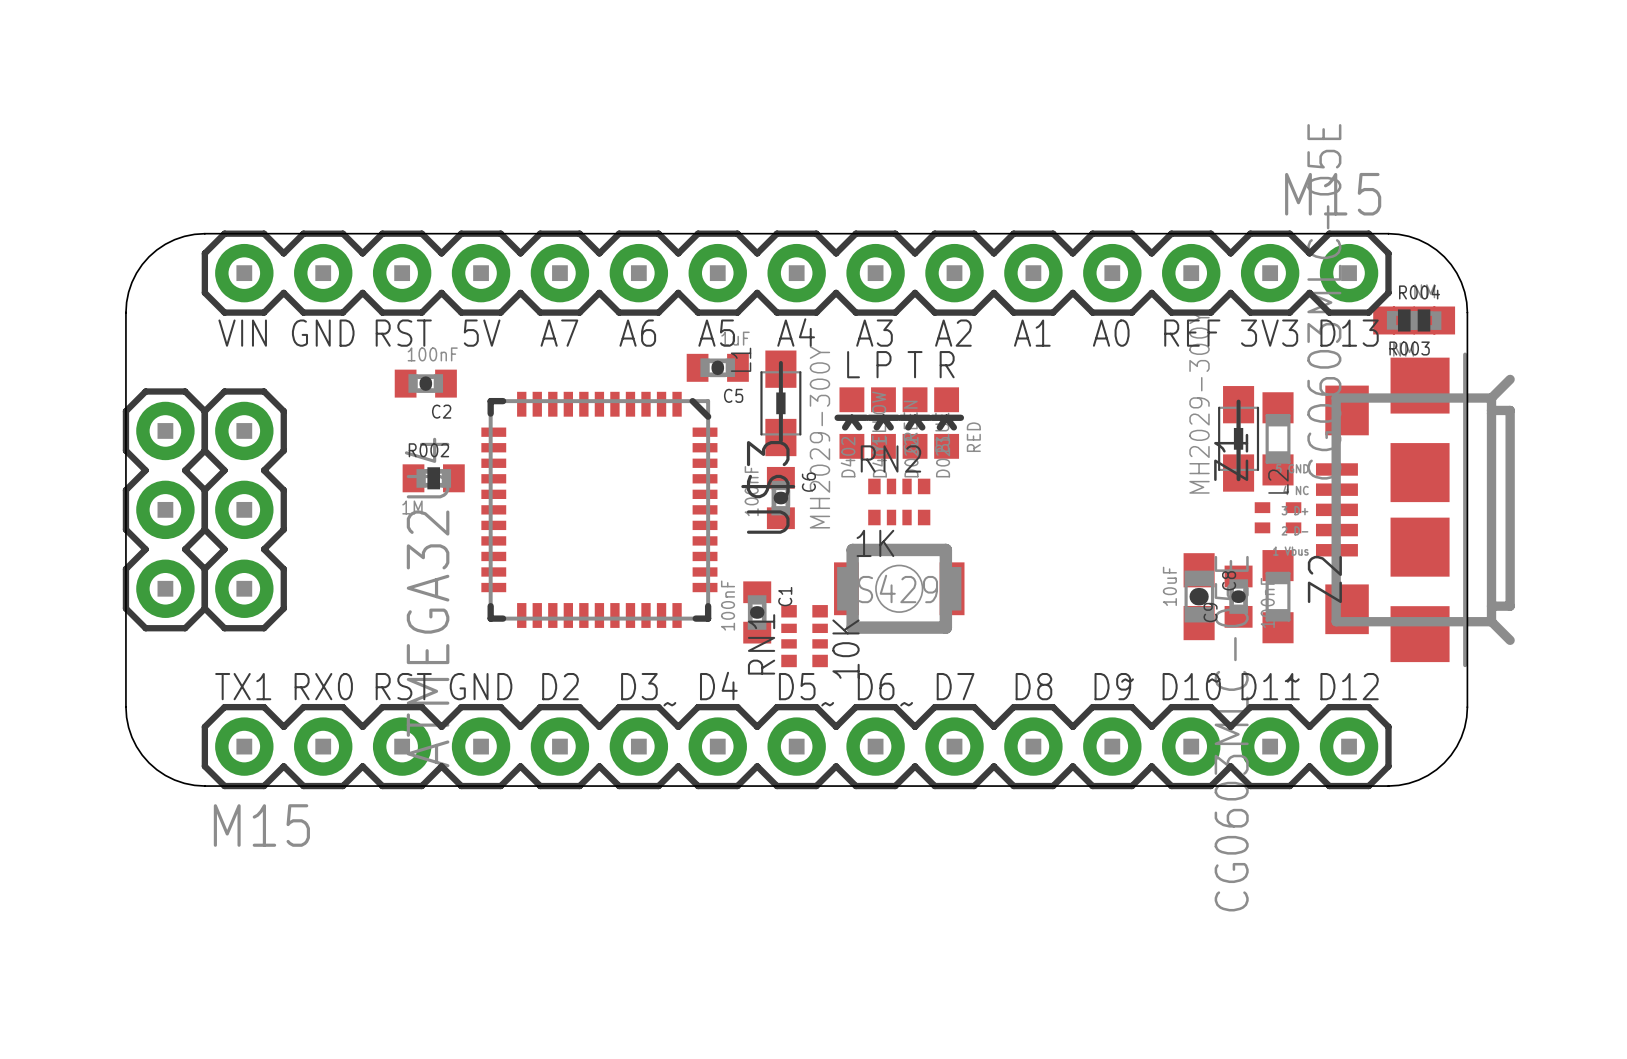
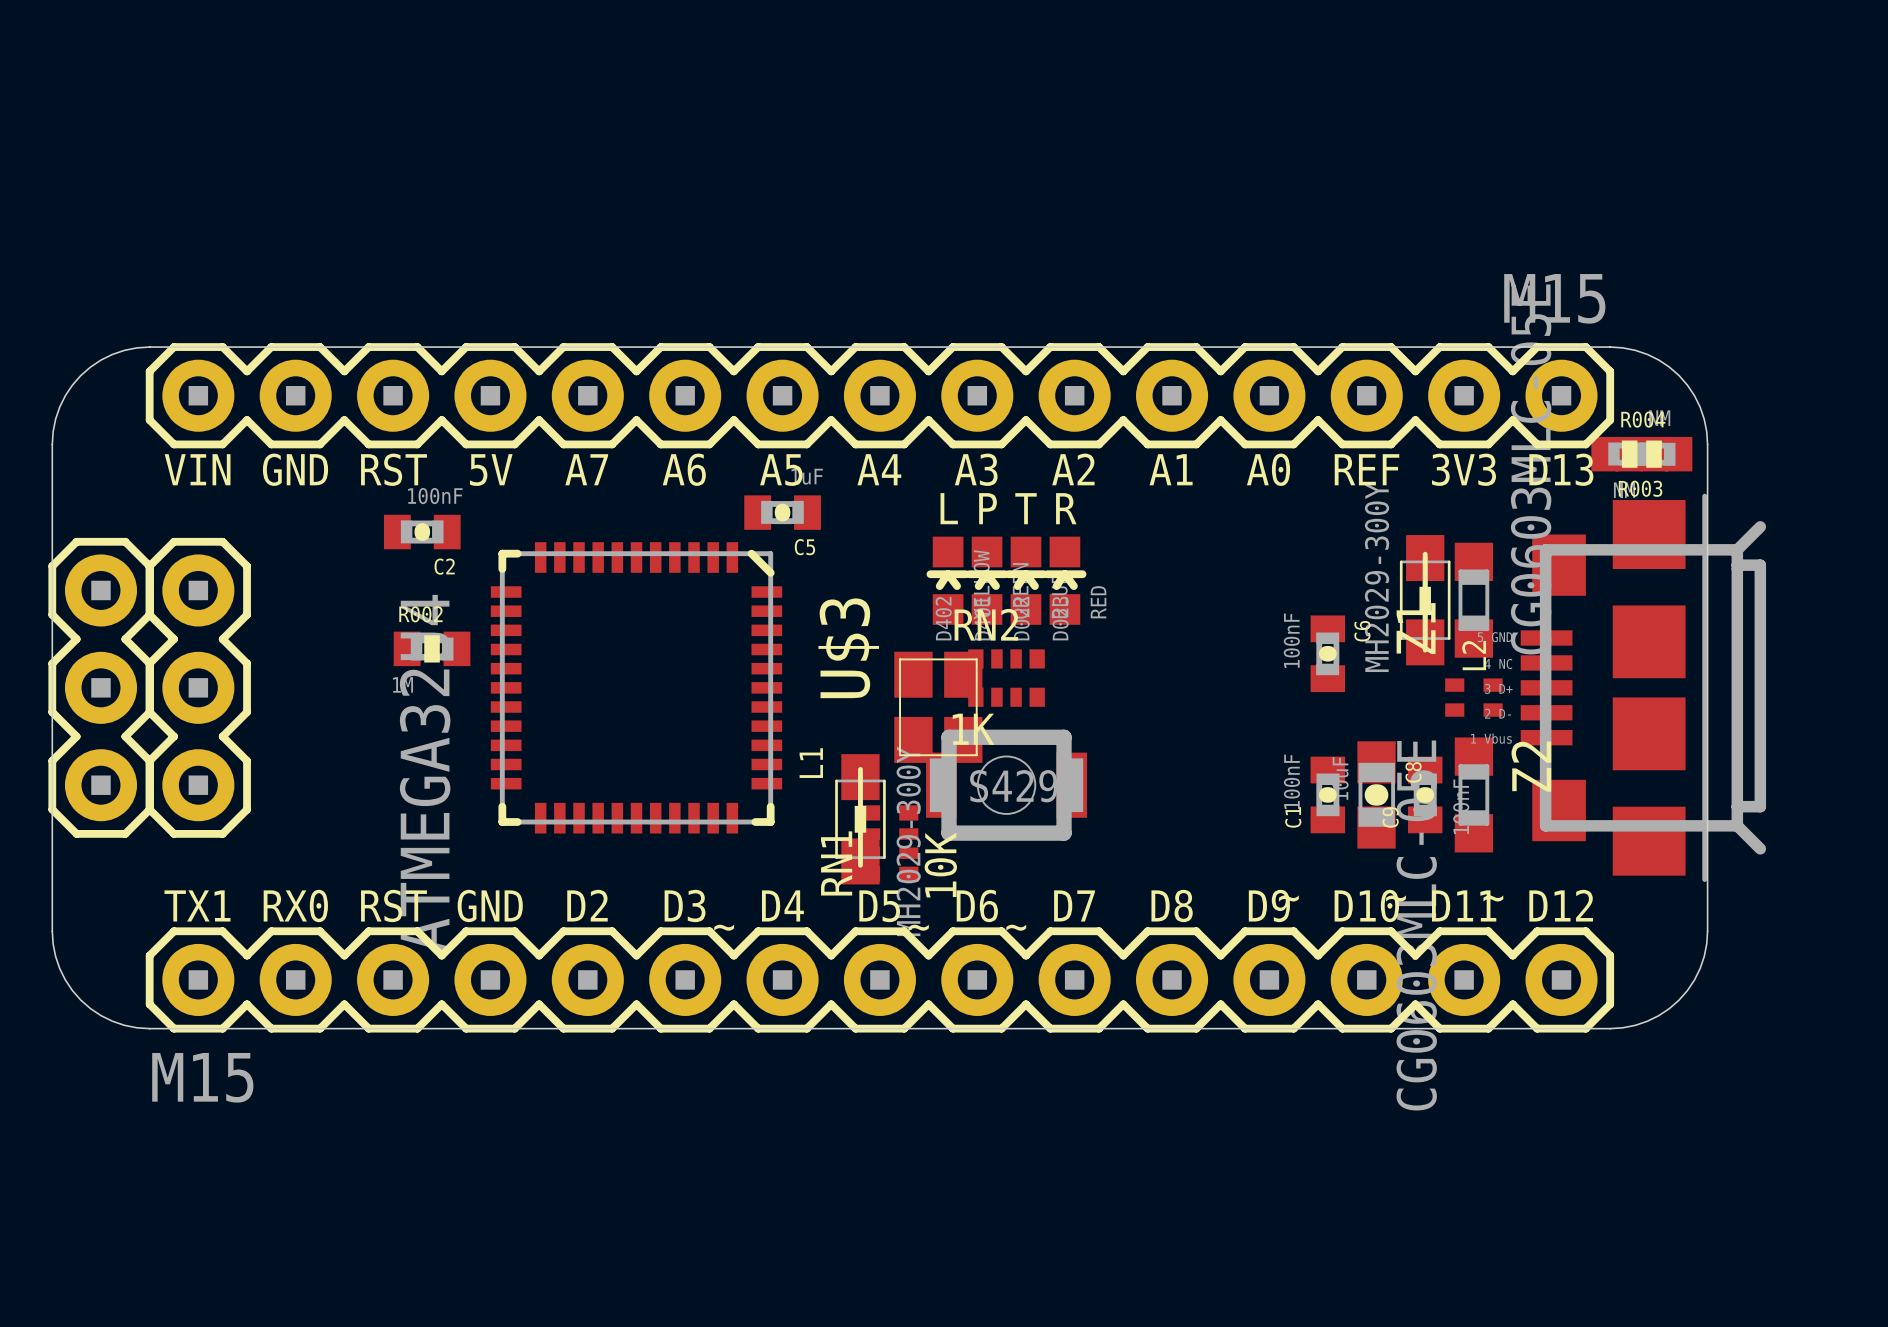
L1 position: (780, 403) -> (860, 819)
C6 position: (780, 498) -> (1327, 653)
part: none -> (938, 707)
C1 name position: C1 (785, 596) -> C1 (1293, 817)
C1 position: (757, 612) -> (1327, 794)

